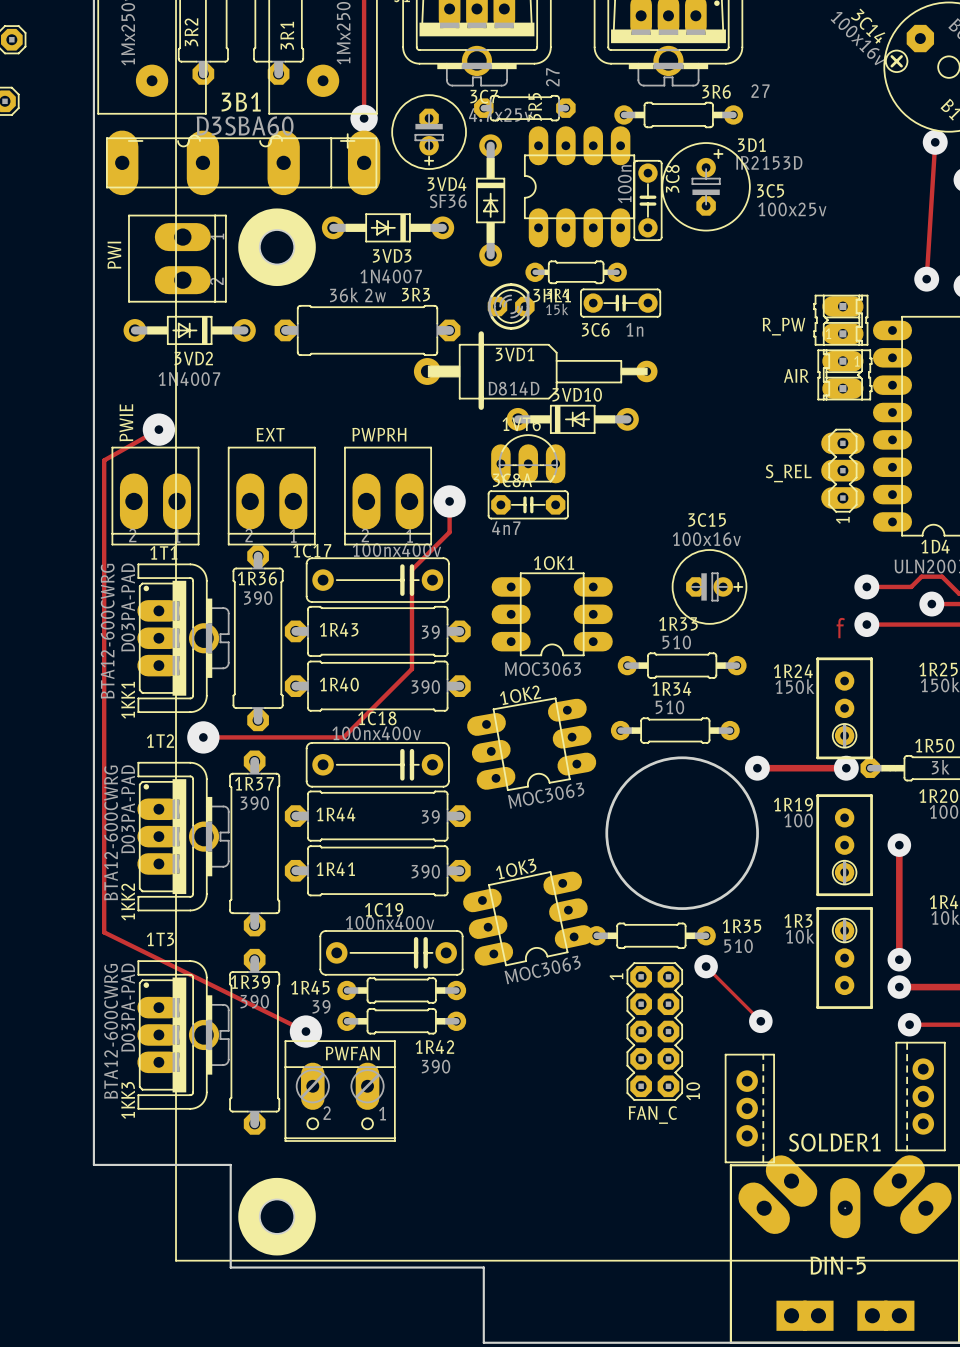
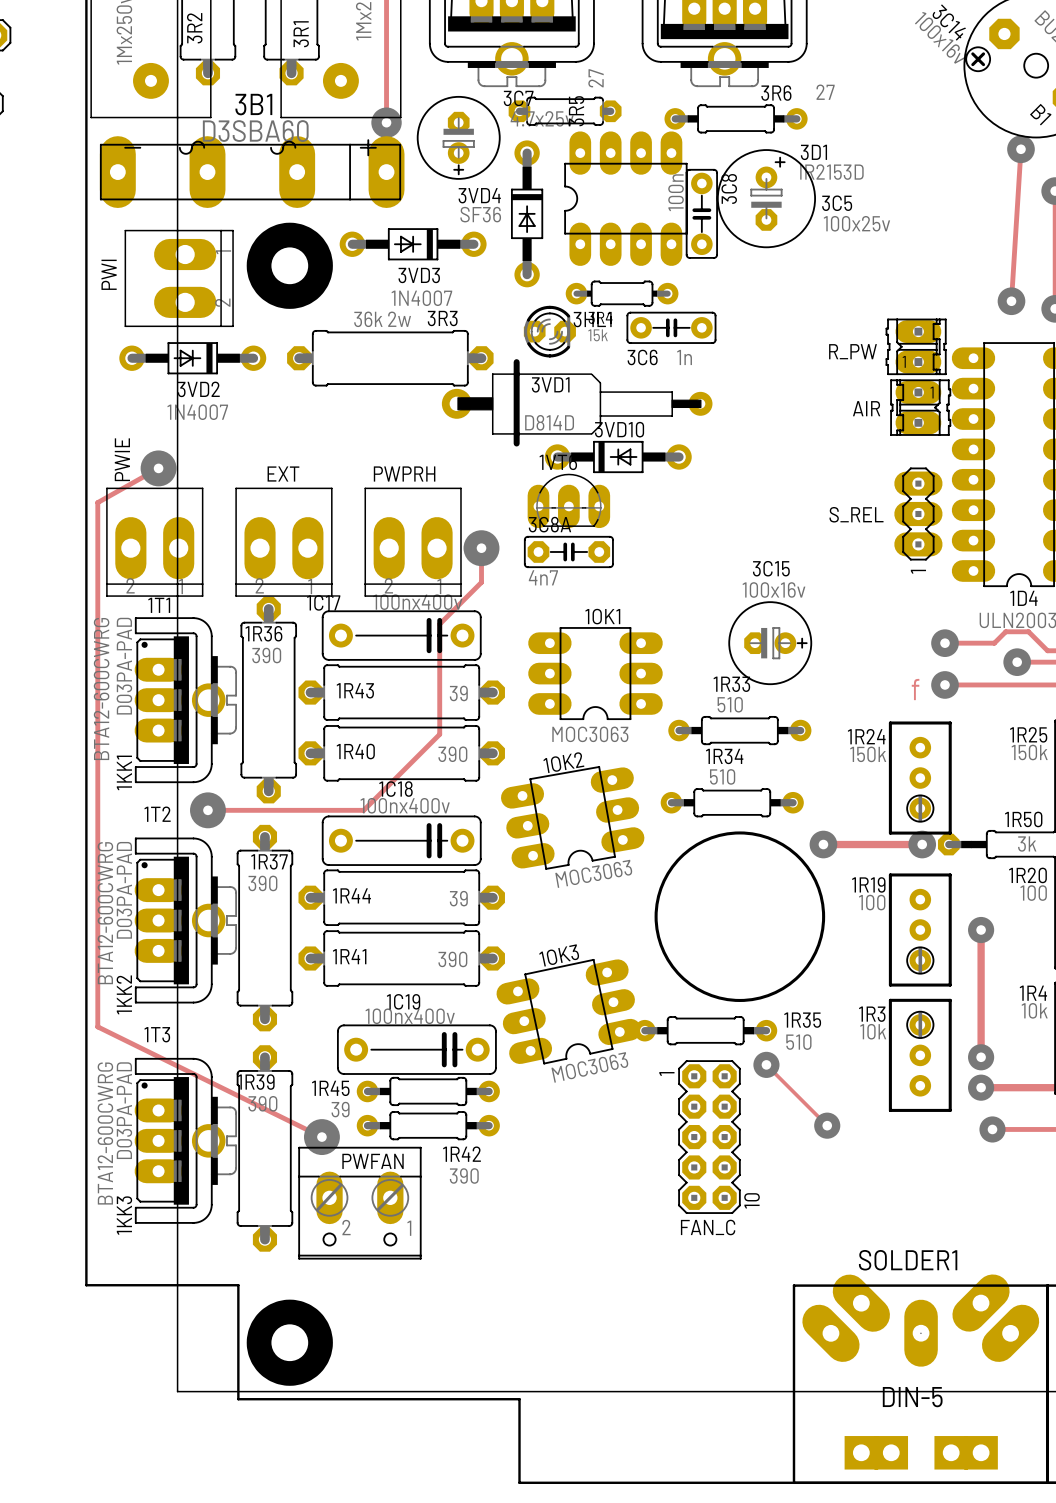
part: (920, 1096) -> none
part: (749, 1108) -> none

